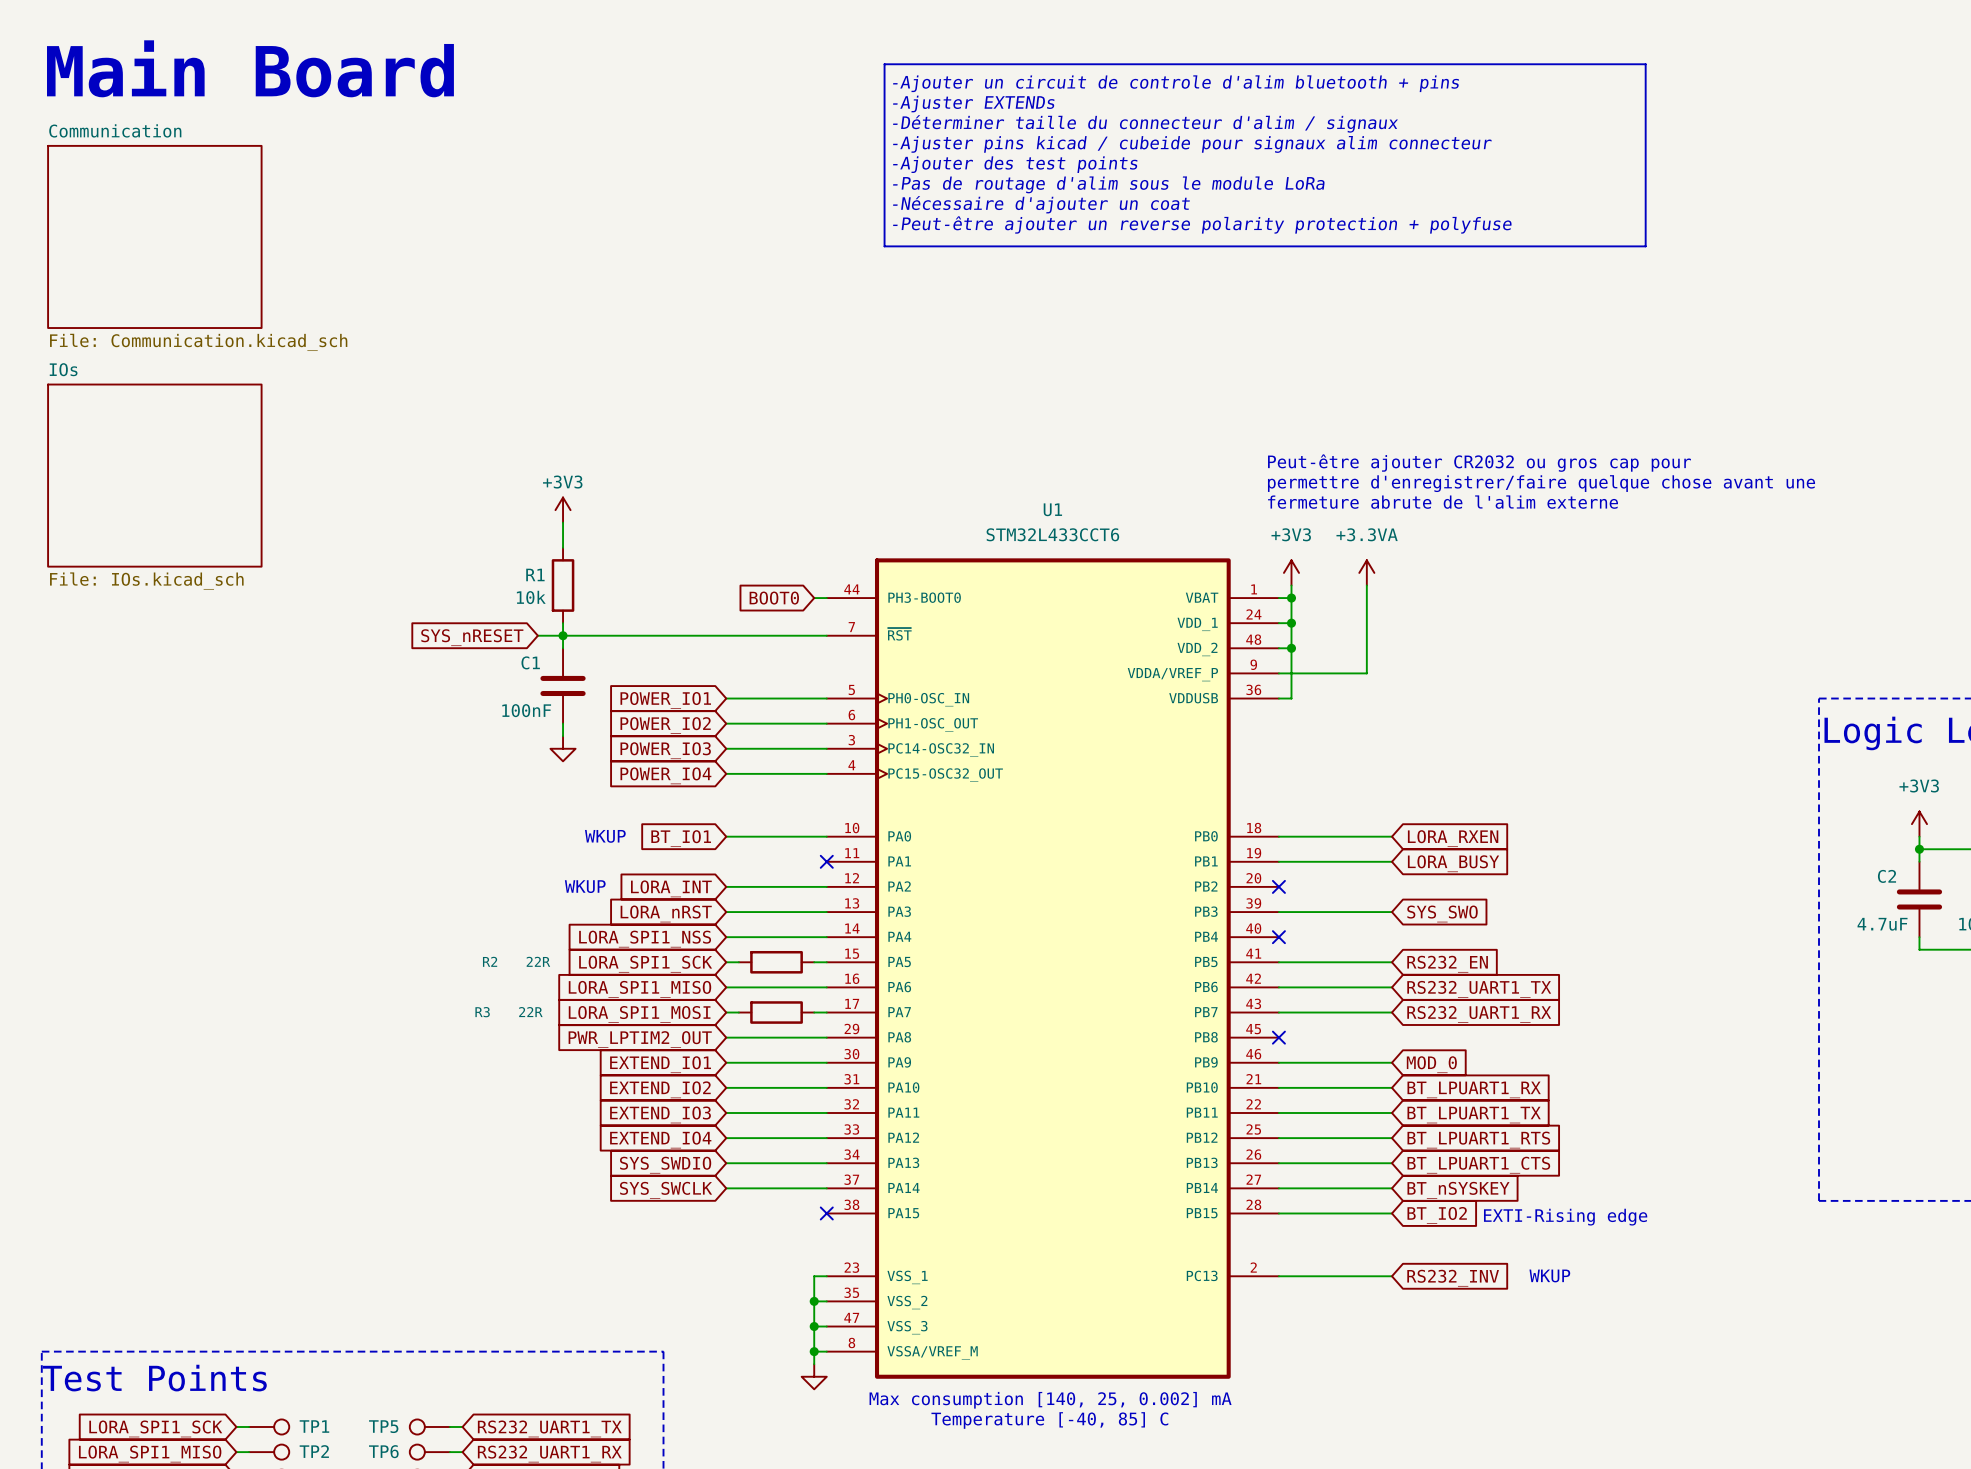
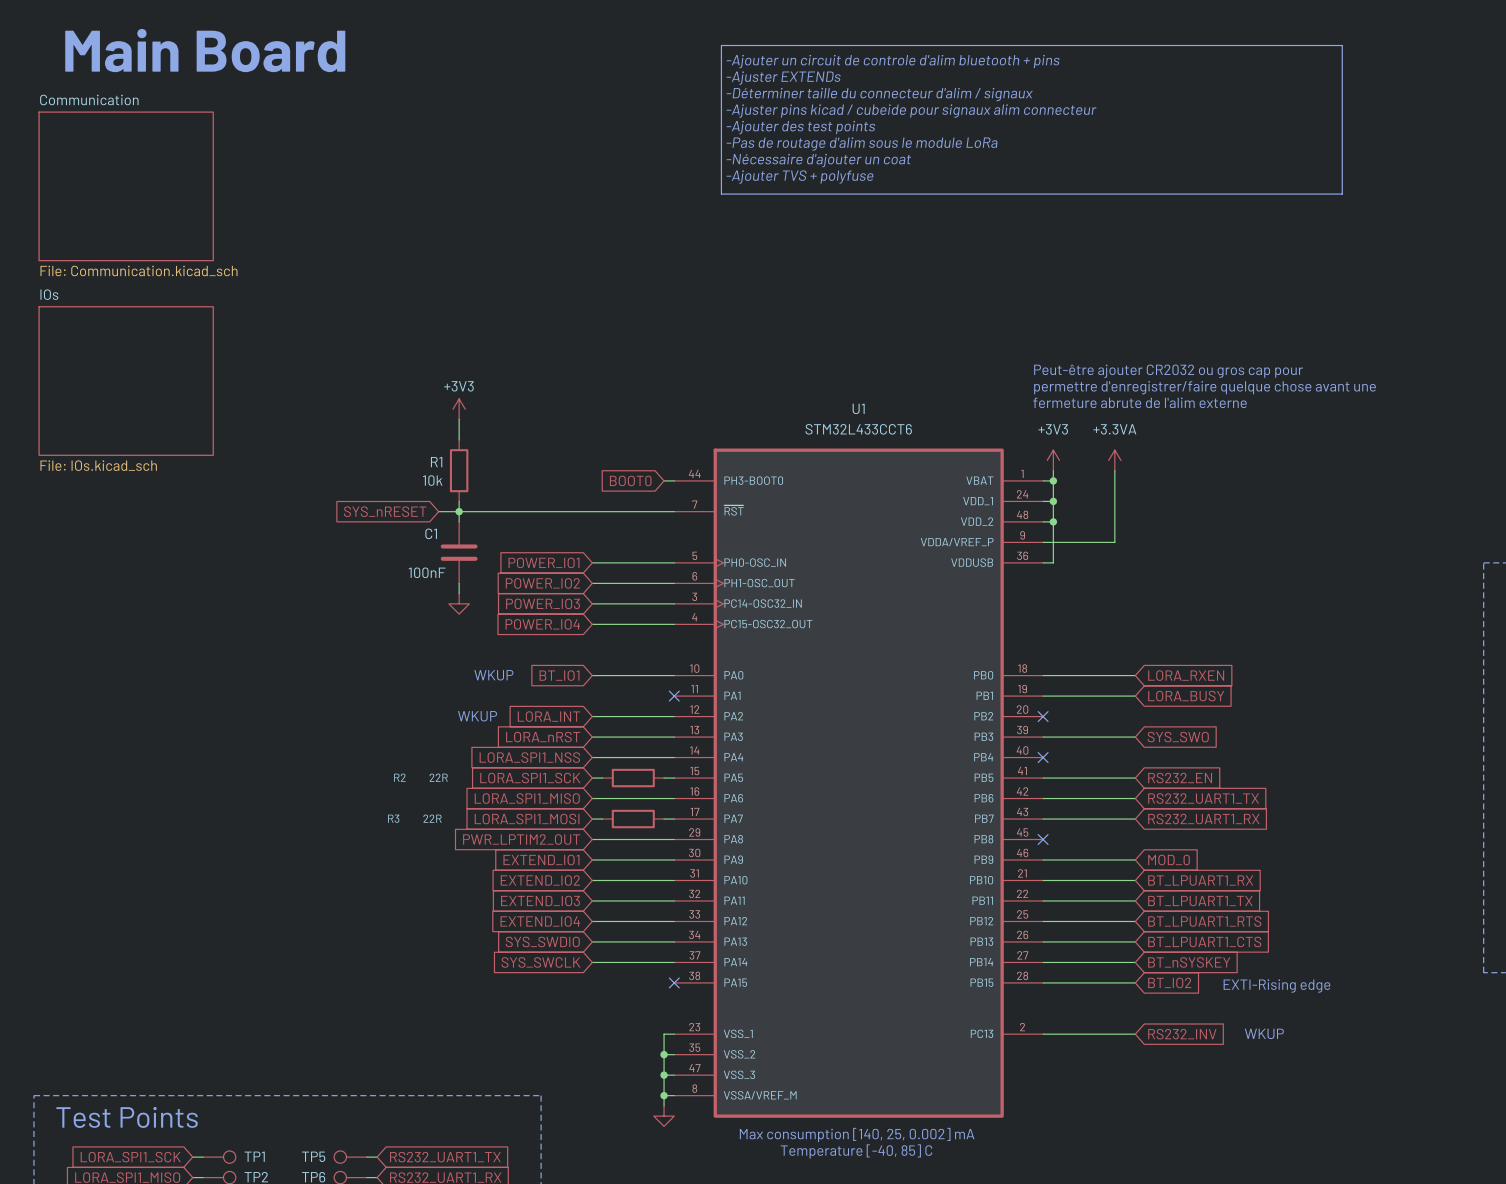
text: -Peut-être ajouter un reverse polarity protection + polyfuse (1202, 224) -> -Ajouter TVS + polyfuse (799, 177)

